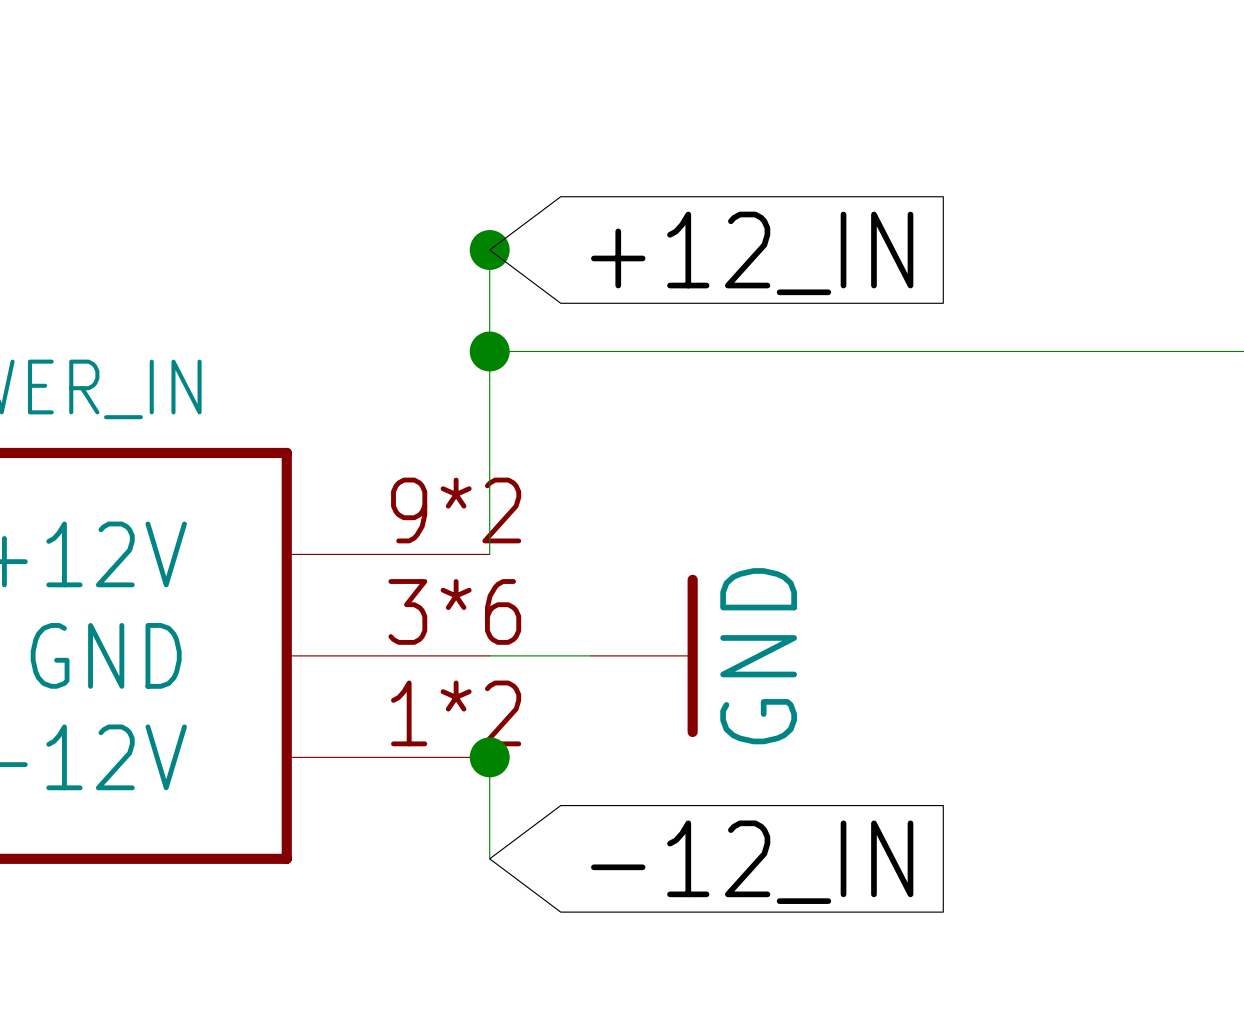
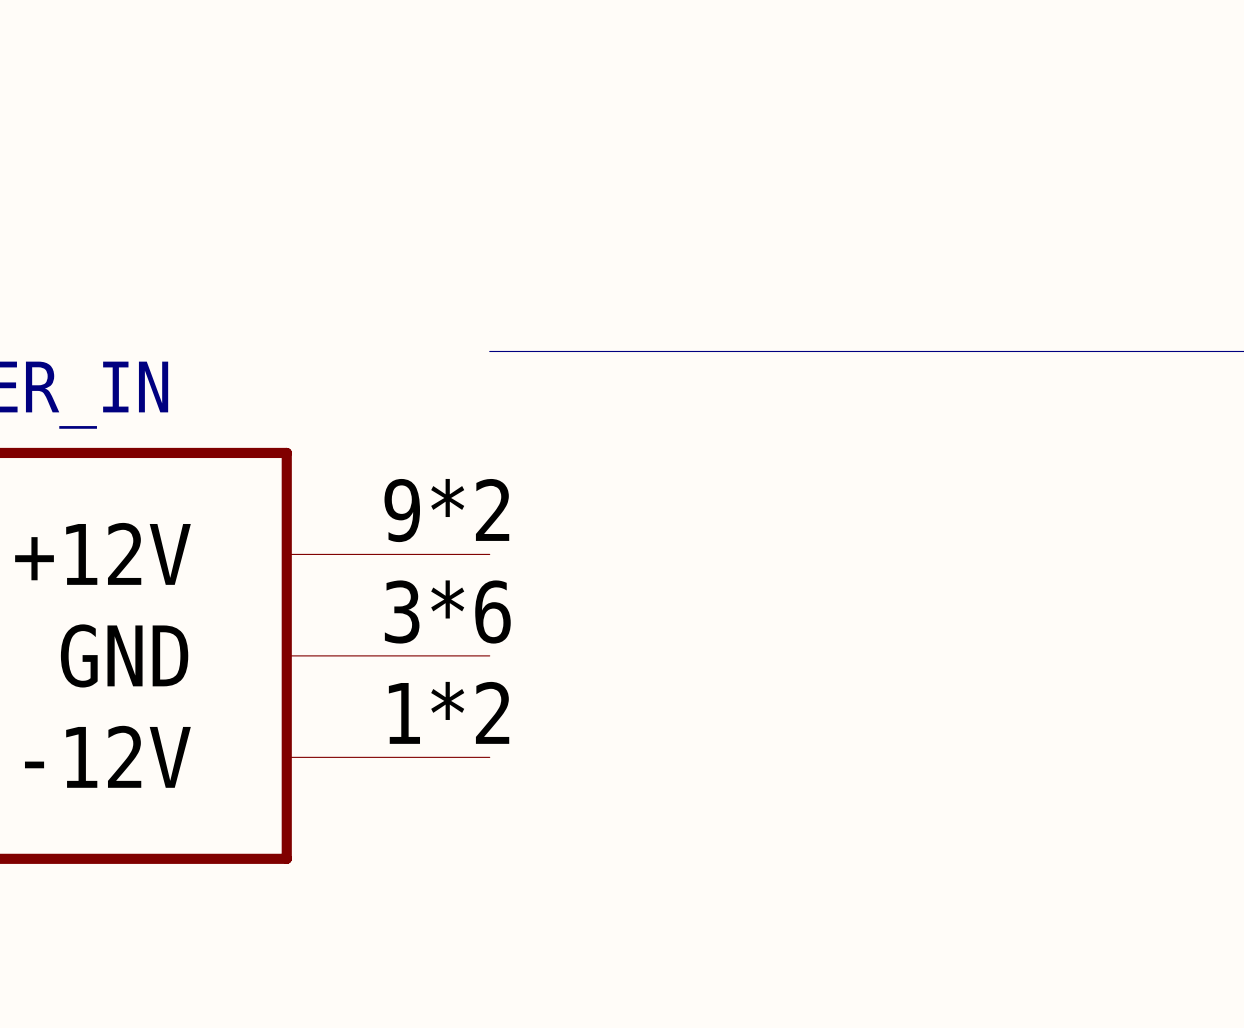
wire: (489, 250) (489, 554) -> none
junction: (489, 250) -> none
global label: +12_IN (752, 253) -> none
junction: (489, 351) -> none
wire: (489, 655) (591, 655) -> none
power symbol: GND (644, 655) -> none
wire: (489, 757) (489, 858) -> none
junction: (489, 757) -> none
global label: -12_IN (752, 862) -> none

